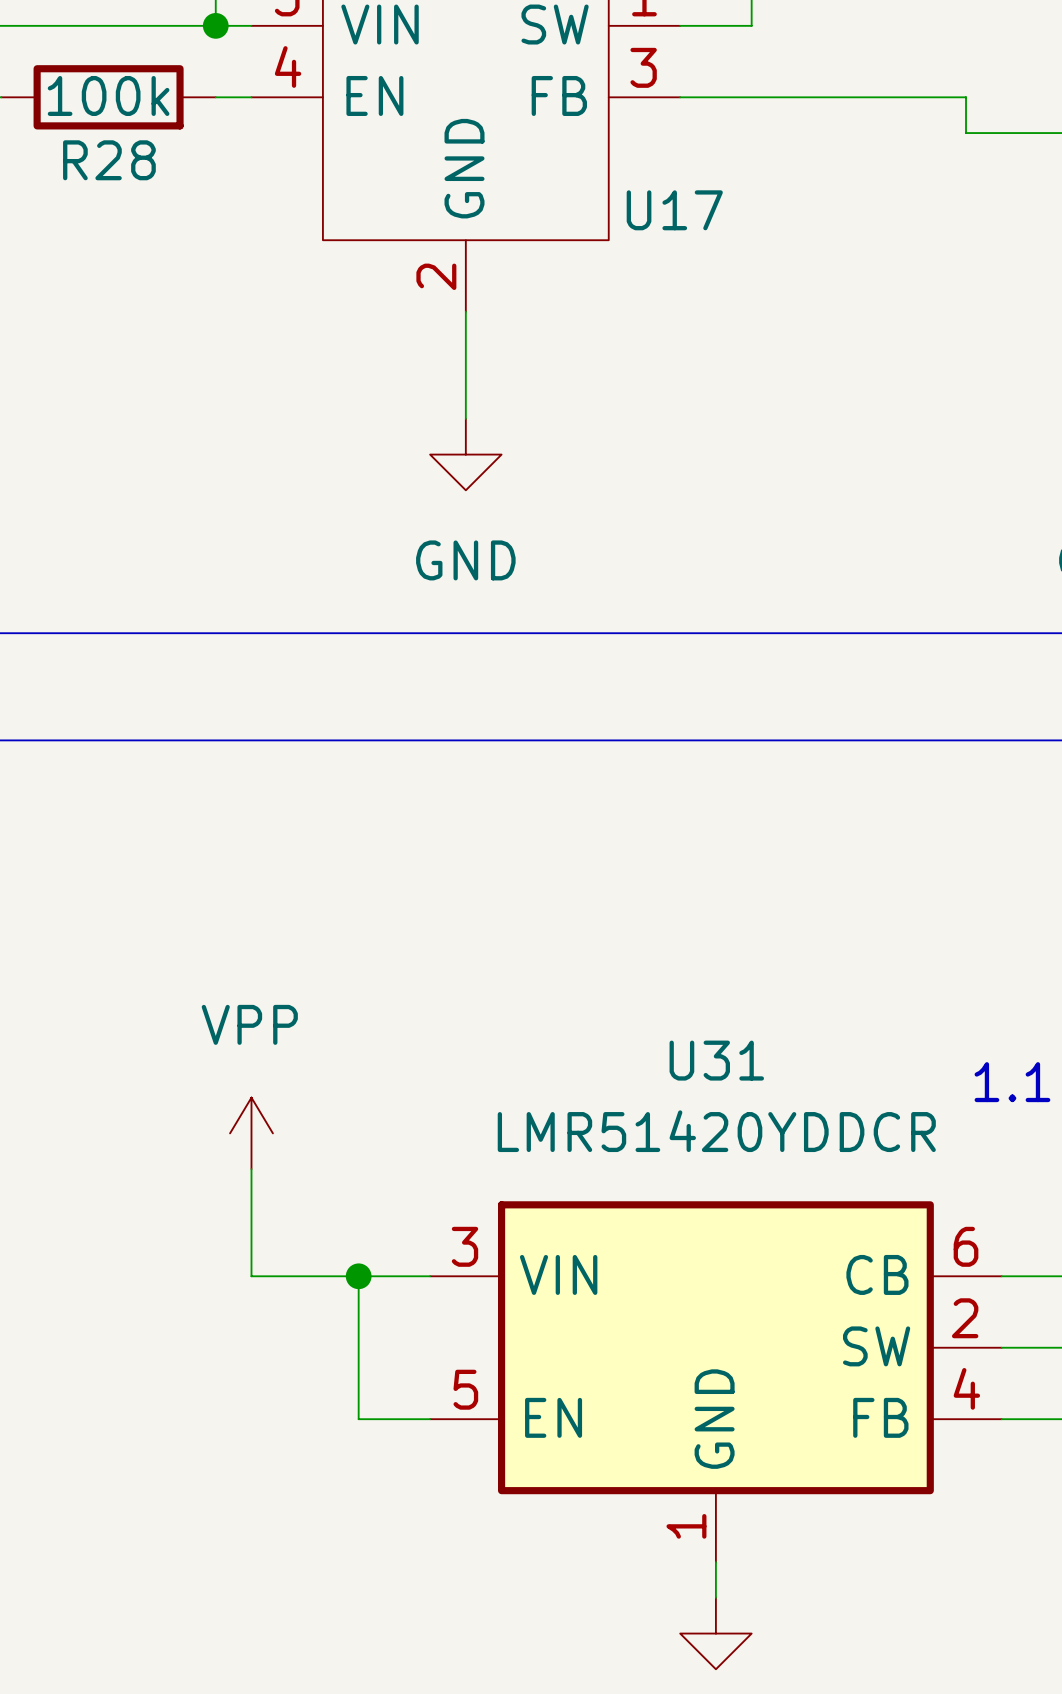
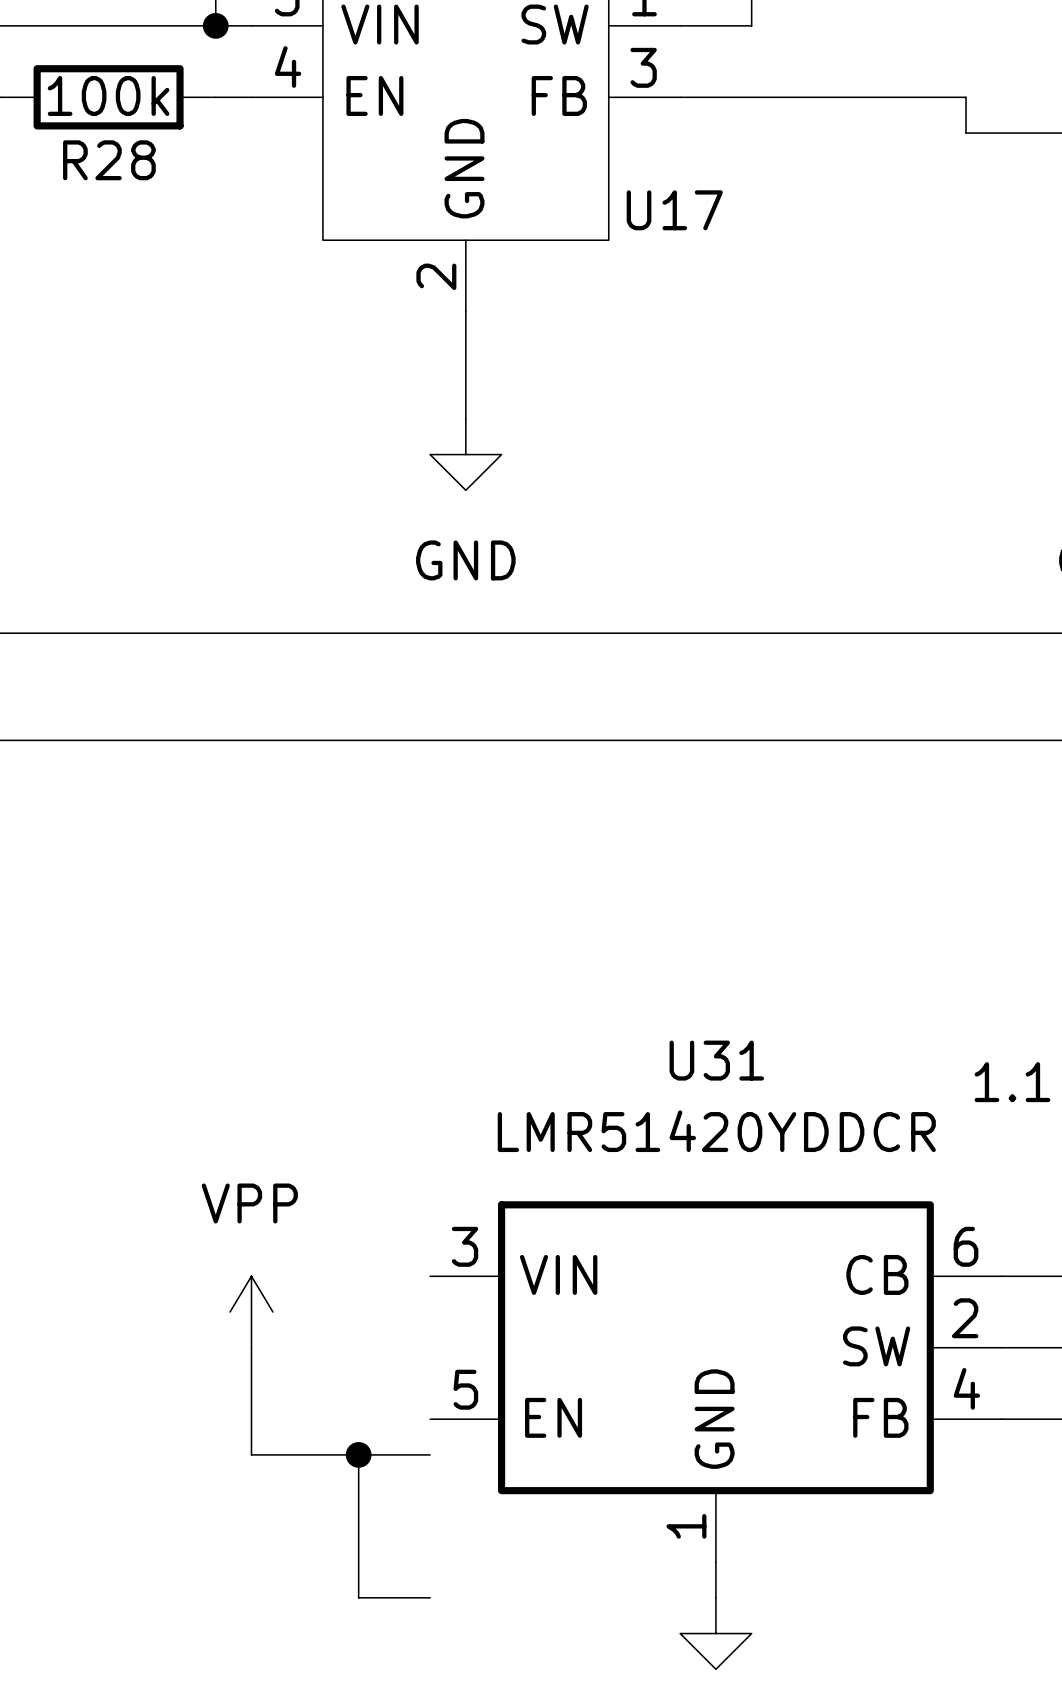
power symbol position: VPP (251, 1133) -> VPP (251, 1312)
wire: (251, 1169) (251, 1276) (430, 1276) -> (251, 1347) (251, 1454) (430, 1454)
wire: (358, 1276) (358, 1419) (430, 1419) -> (358, 1454) (358, 1597) (430, 1597)
junction: (358, 1276) -> none
junction: none -> (358, 1454)

